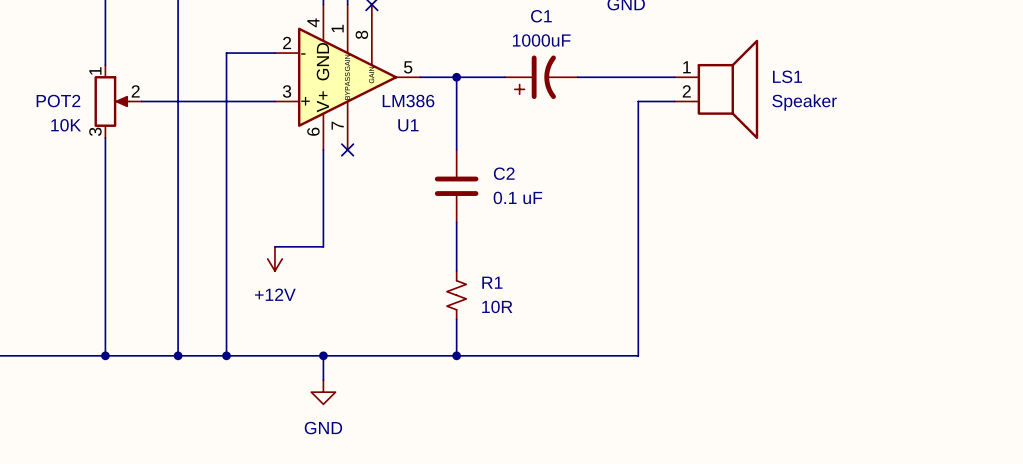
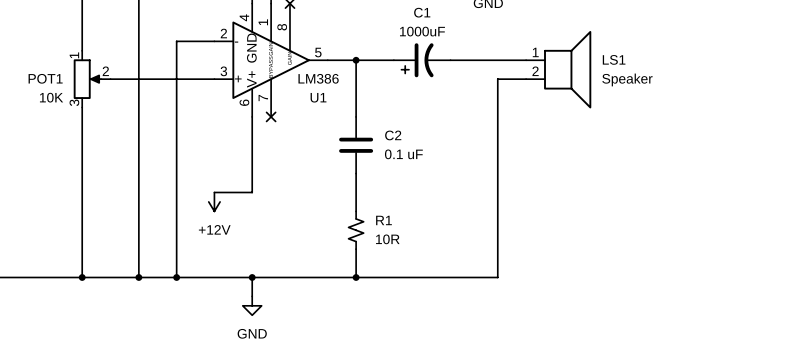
POT2 name: POT2 (58, 101) -> POT1 (45, 78)

